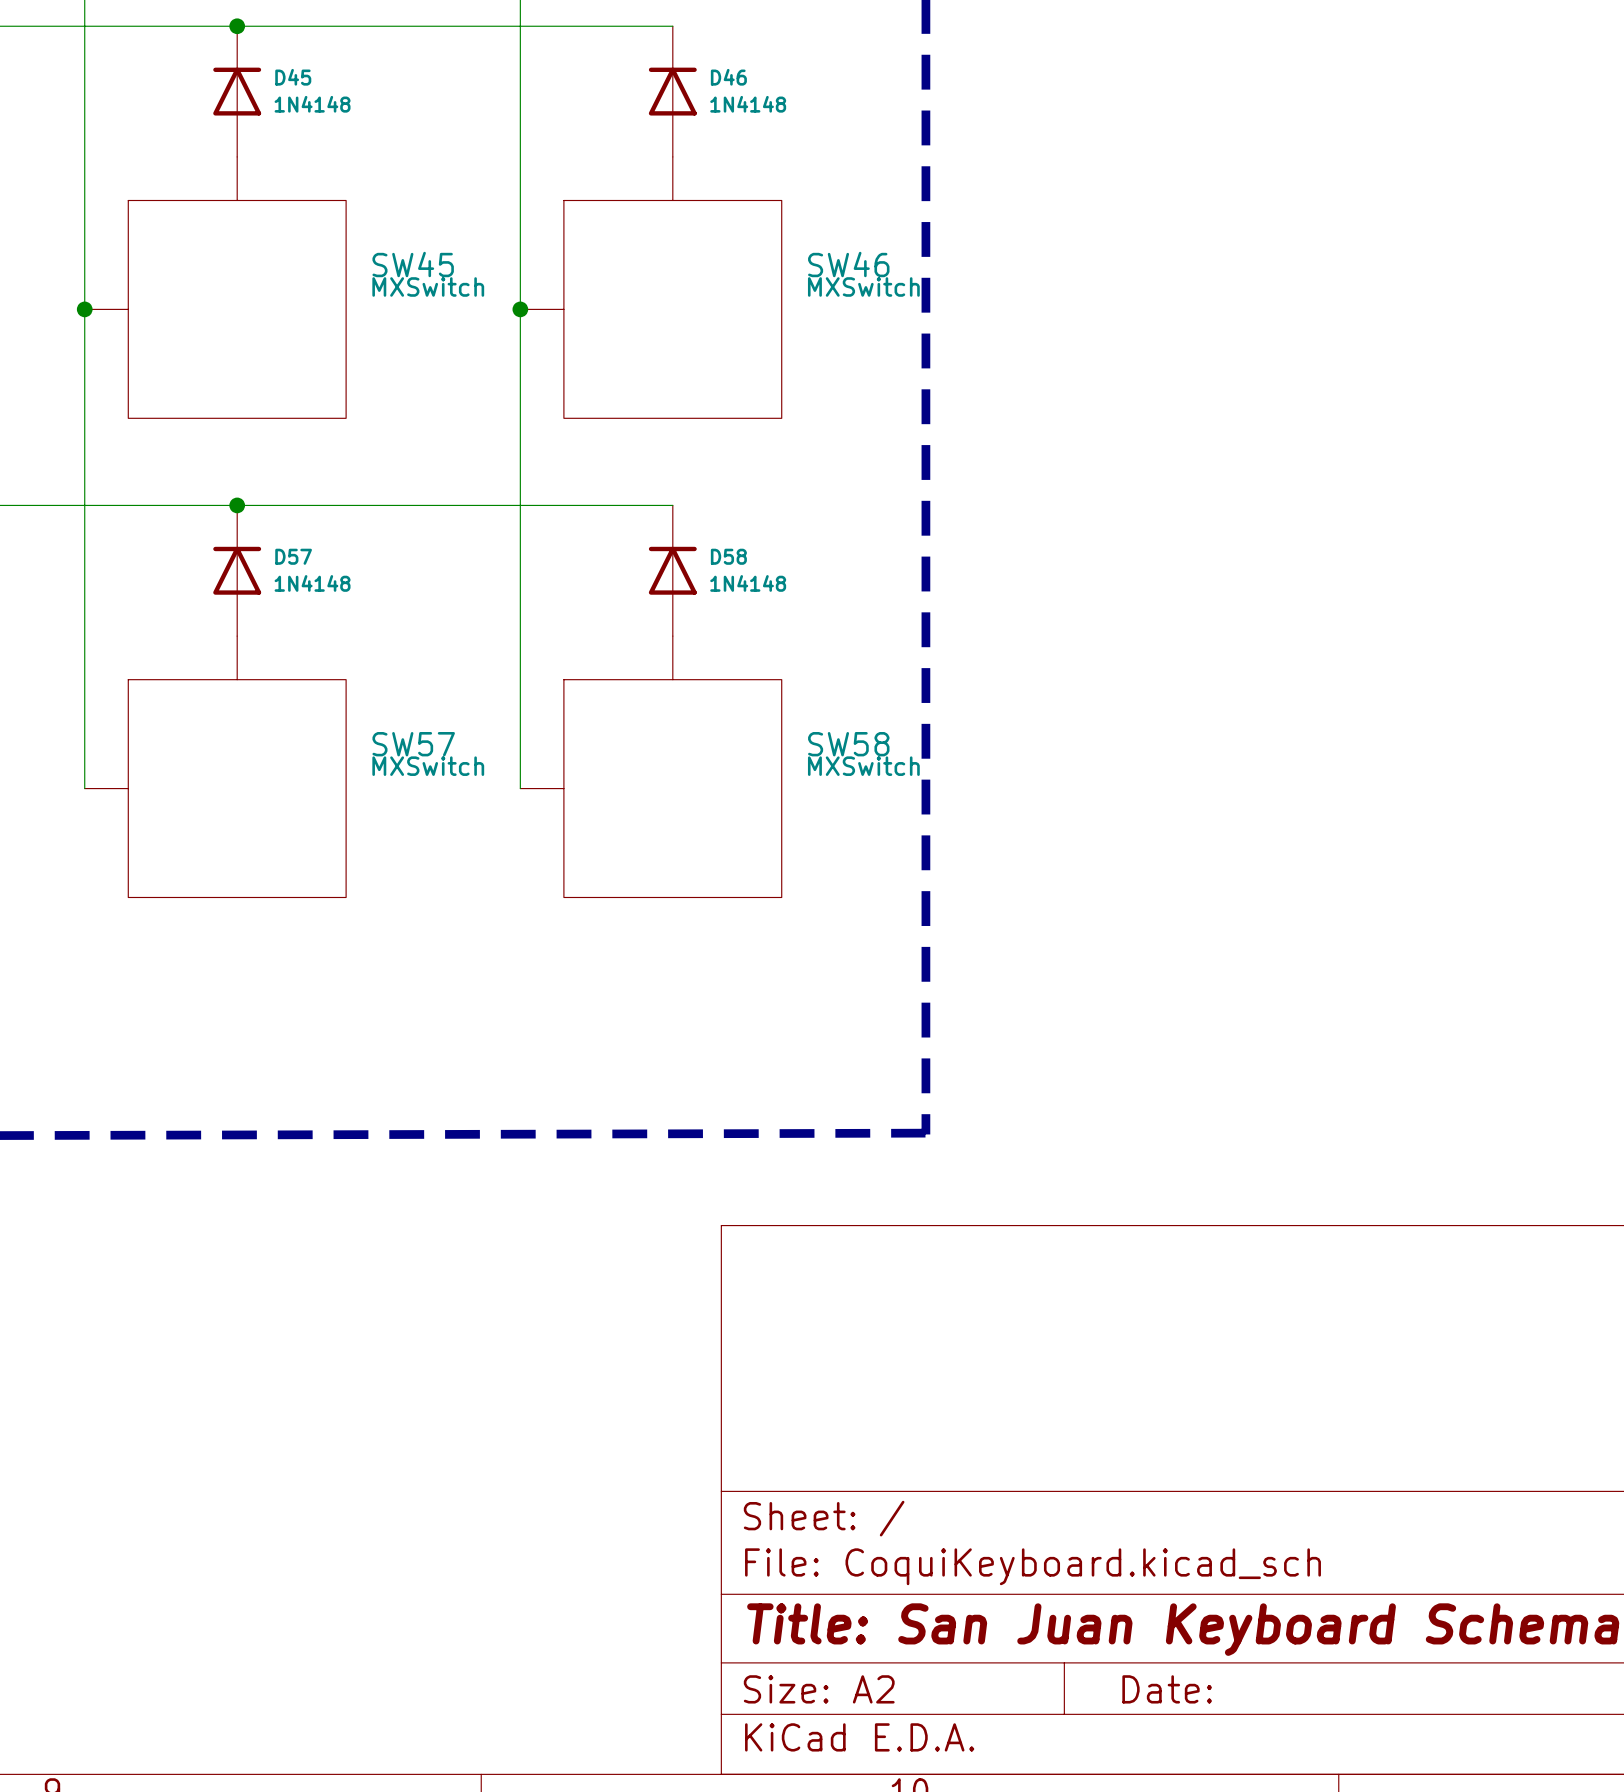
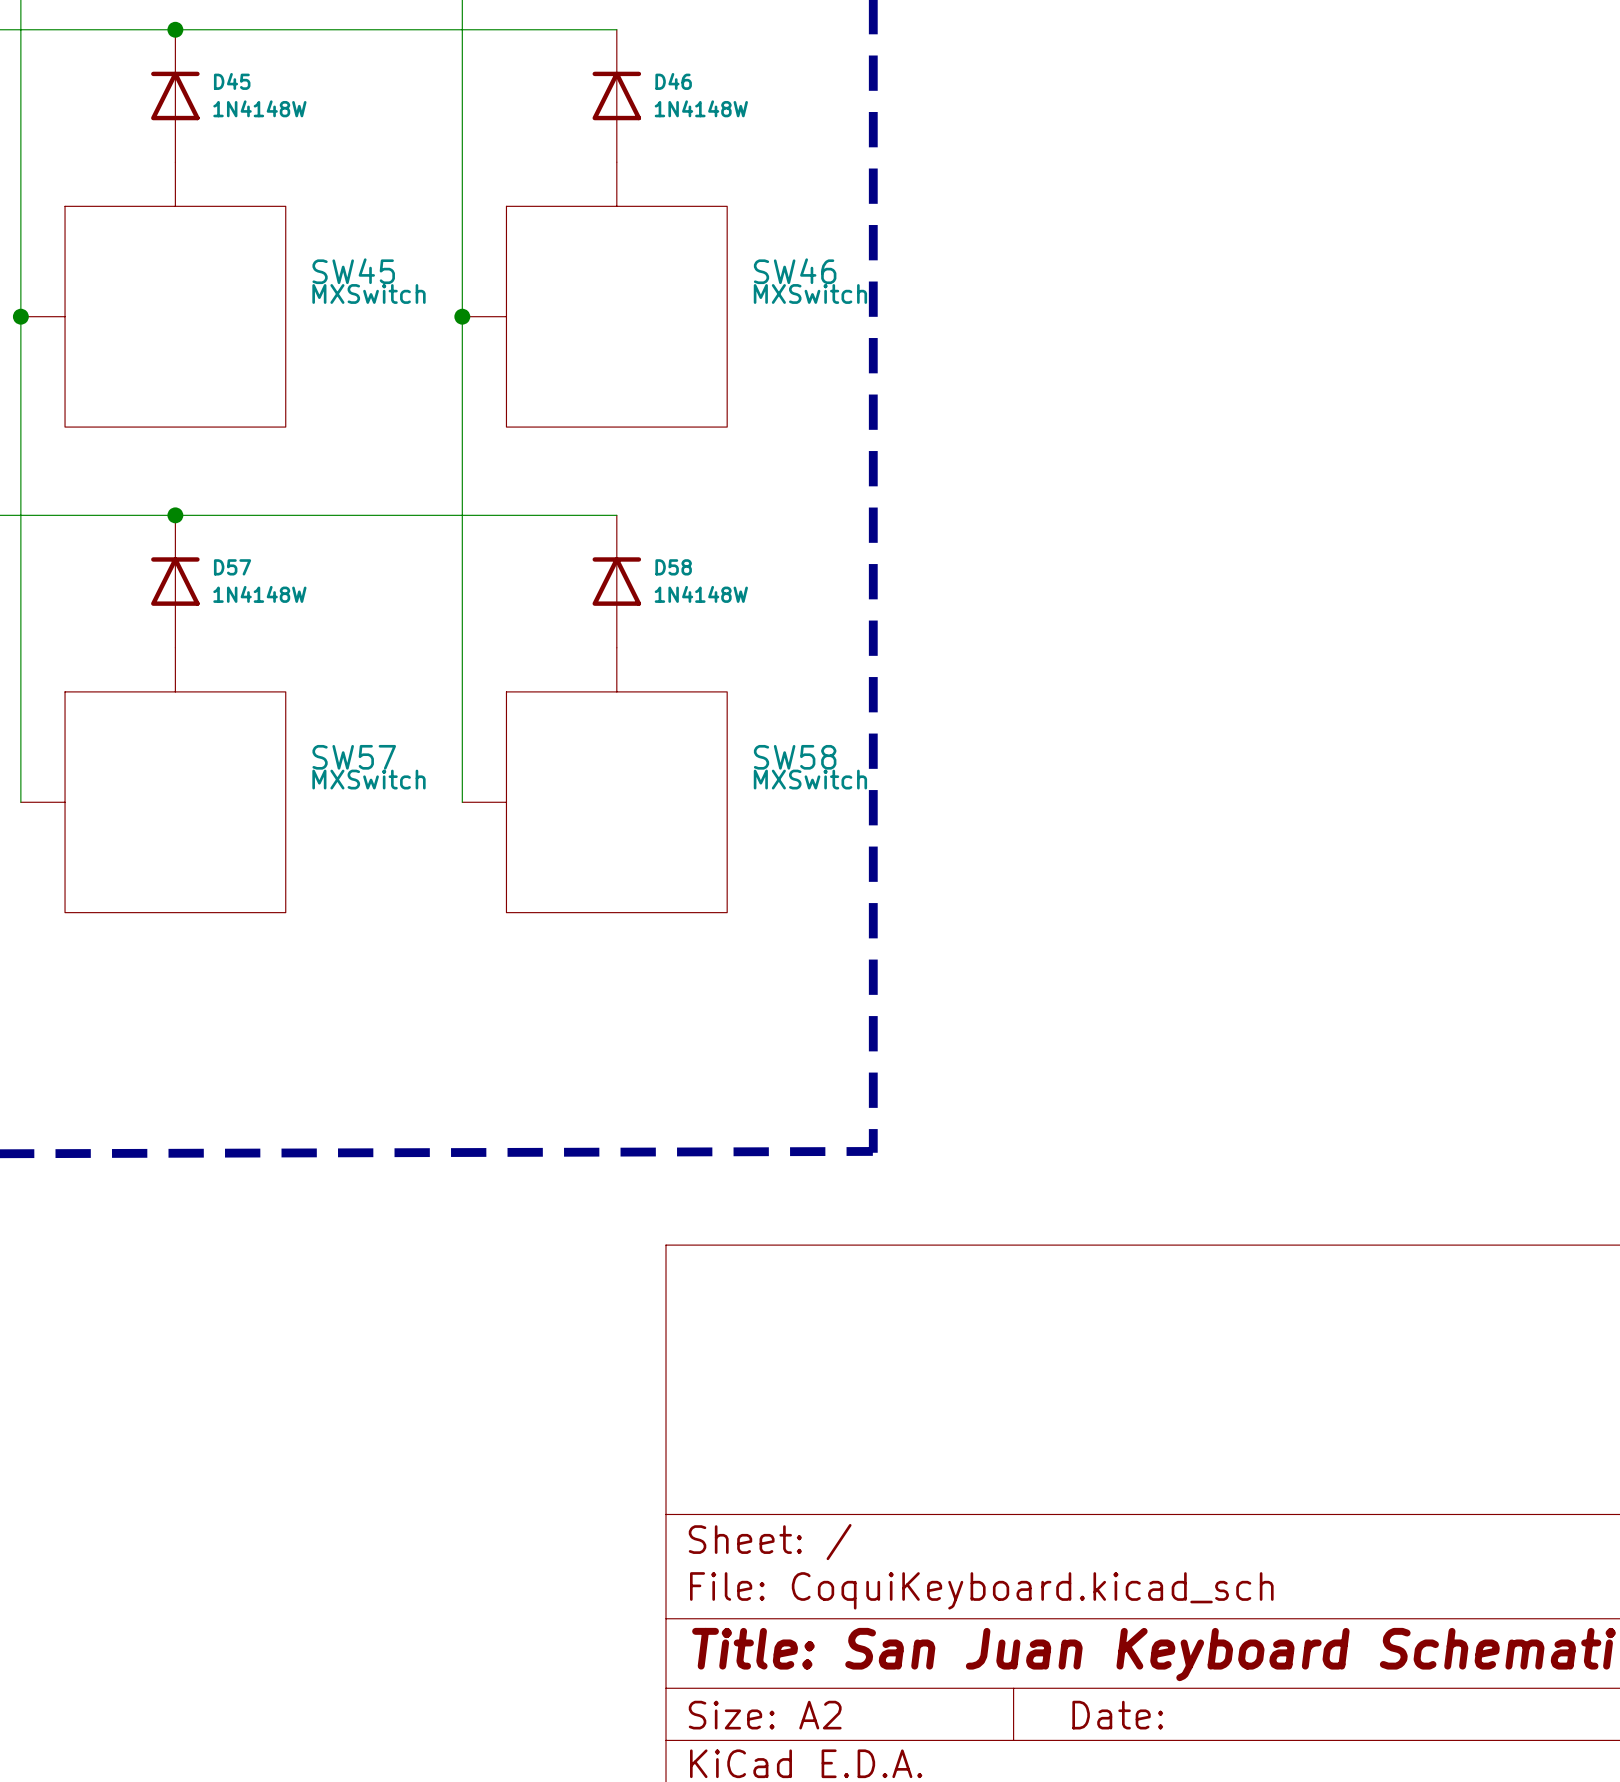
D45 value: 1N4148 (312, 104) -> 1N4148W (259, 108)
D46 value: 1N4148 (748, 104) -> 1N4148W (701, 108)
D57 value: 1N4148 (312, 583) -> 1N4148W (259, 594)
D58 value: 1N4148 (748, 583) -> 1N4148W (701, 594)

